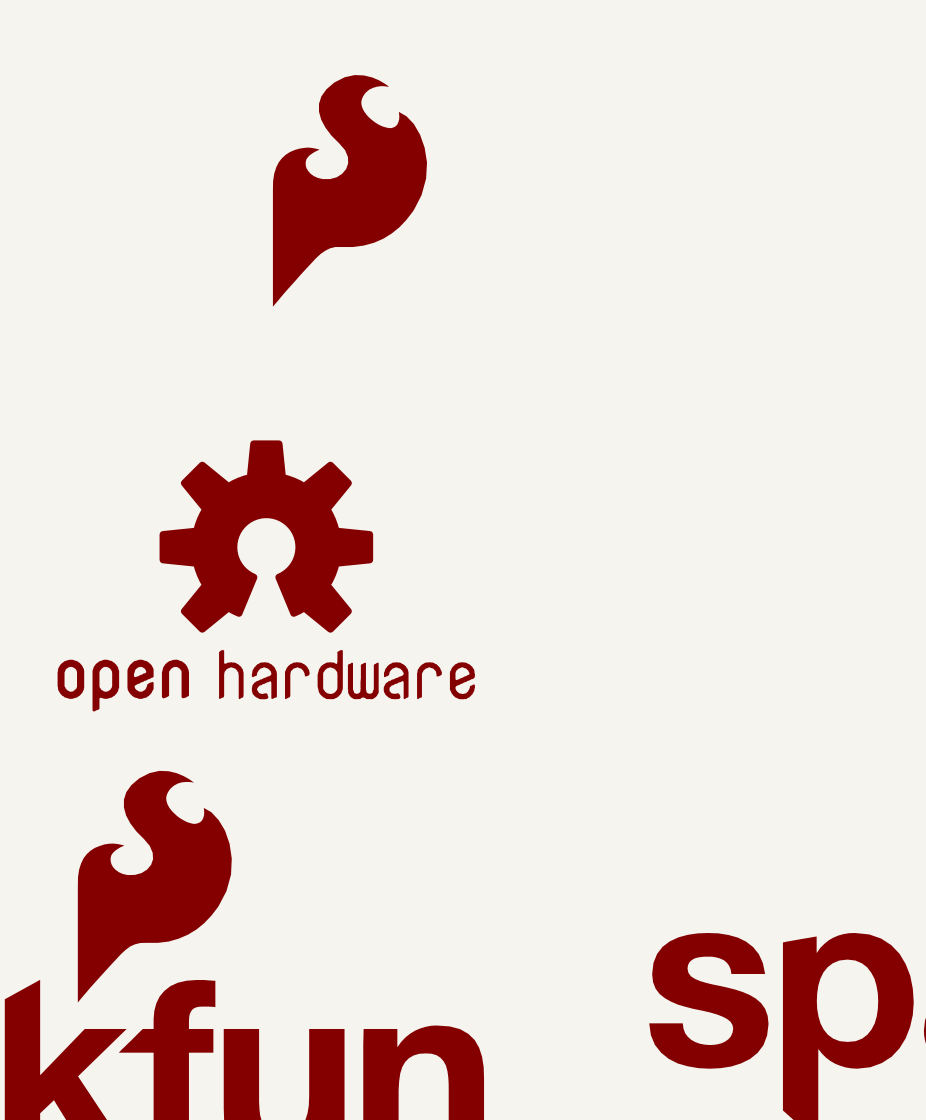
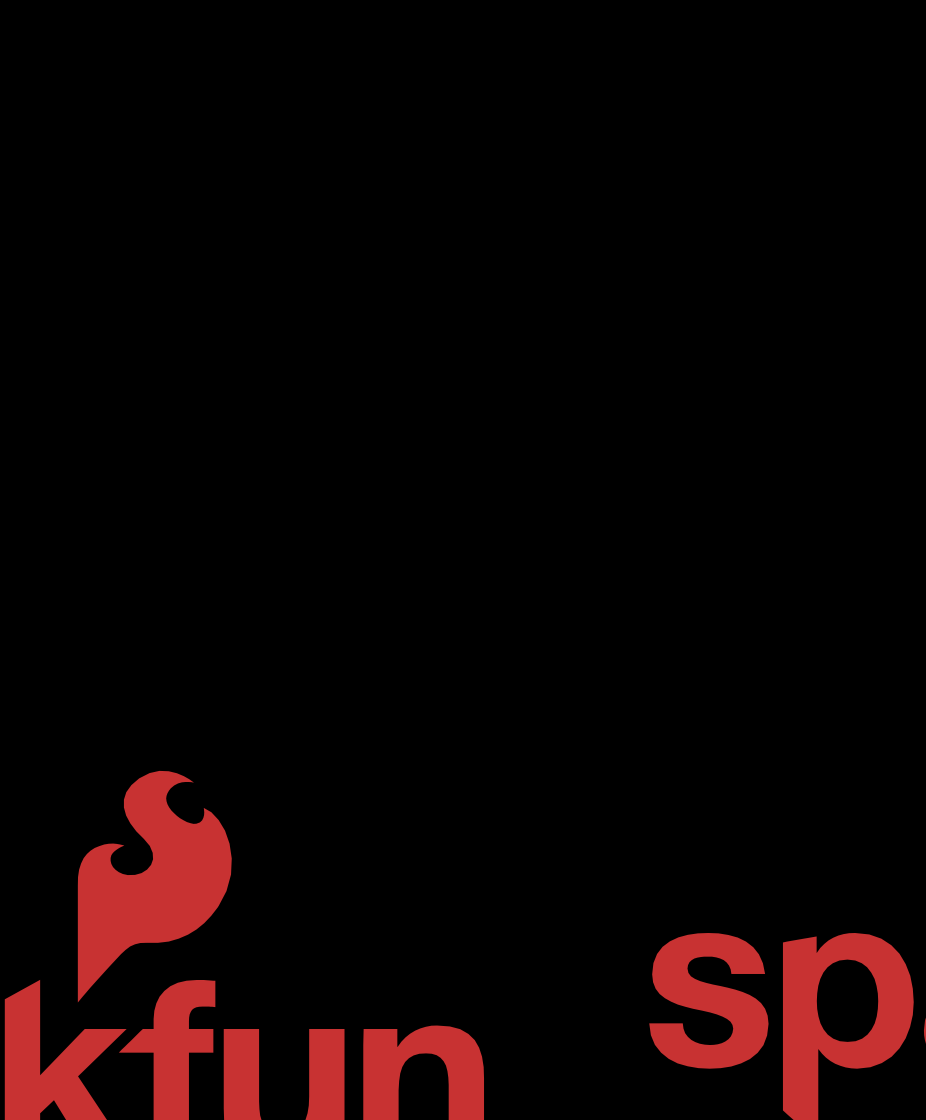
part: (349, 190) -> none
part: (266, 575) -> none

